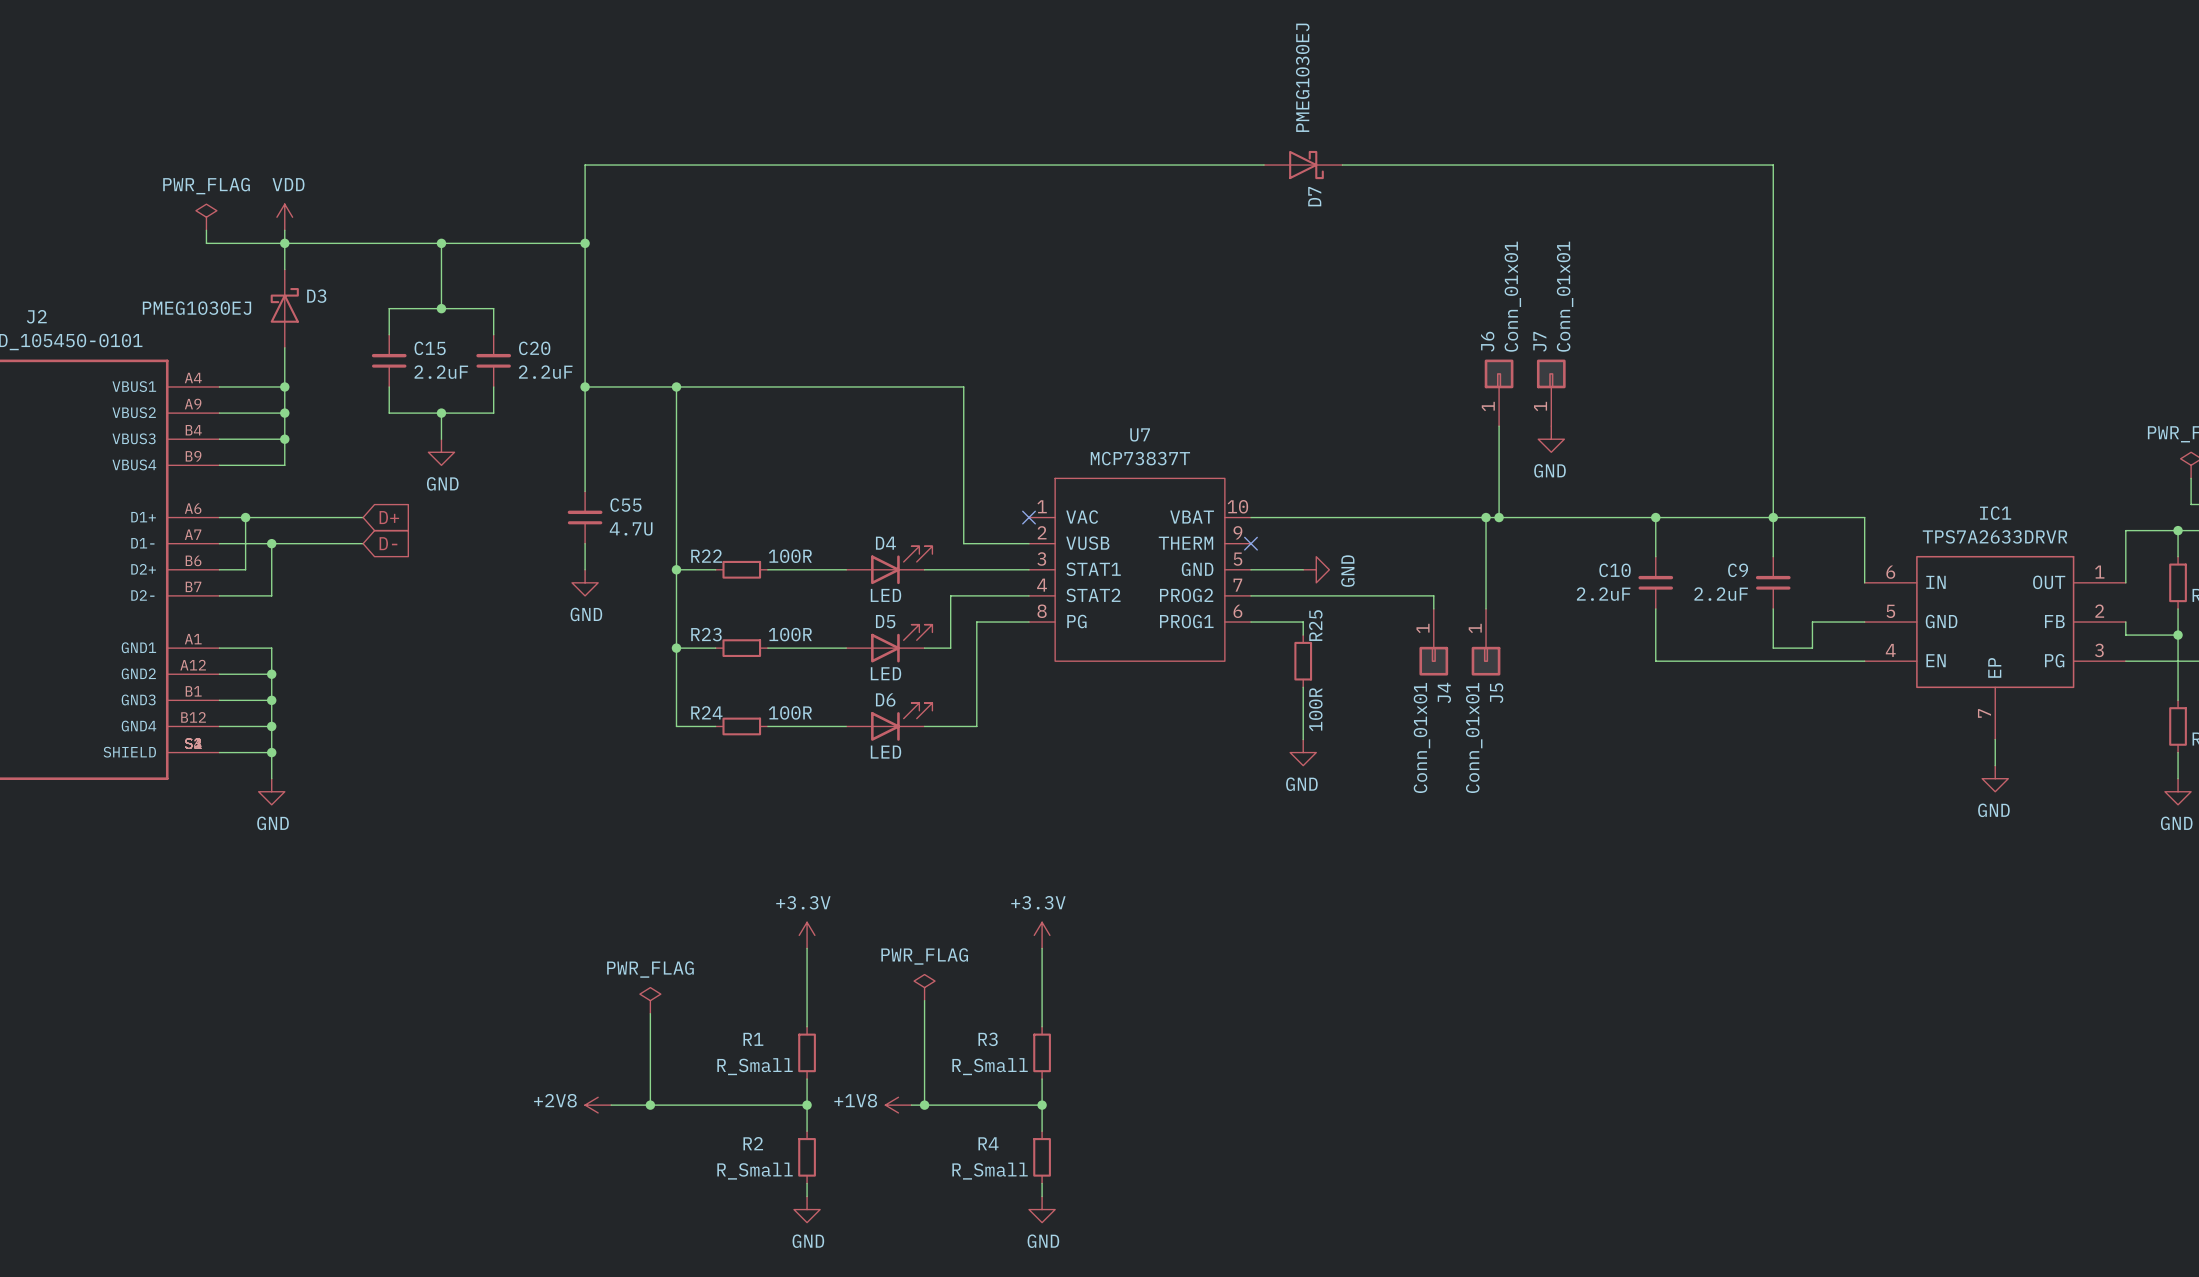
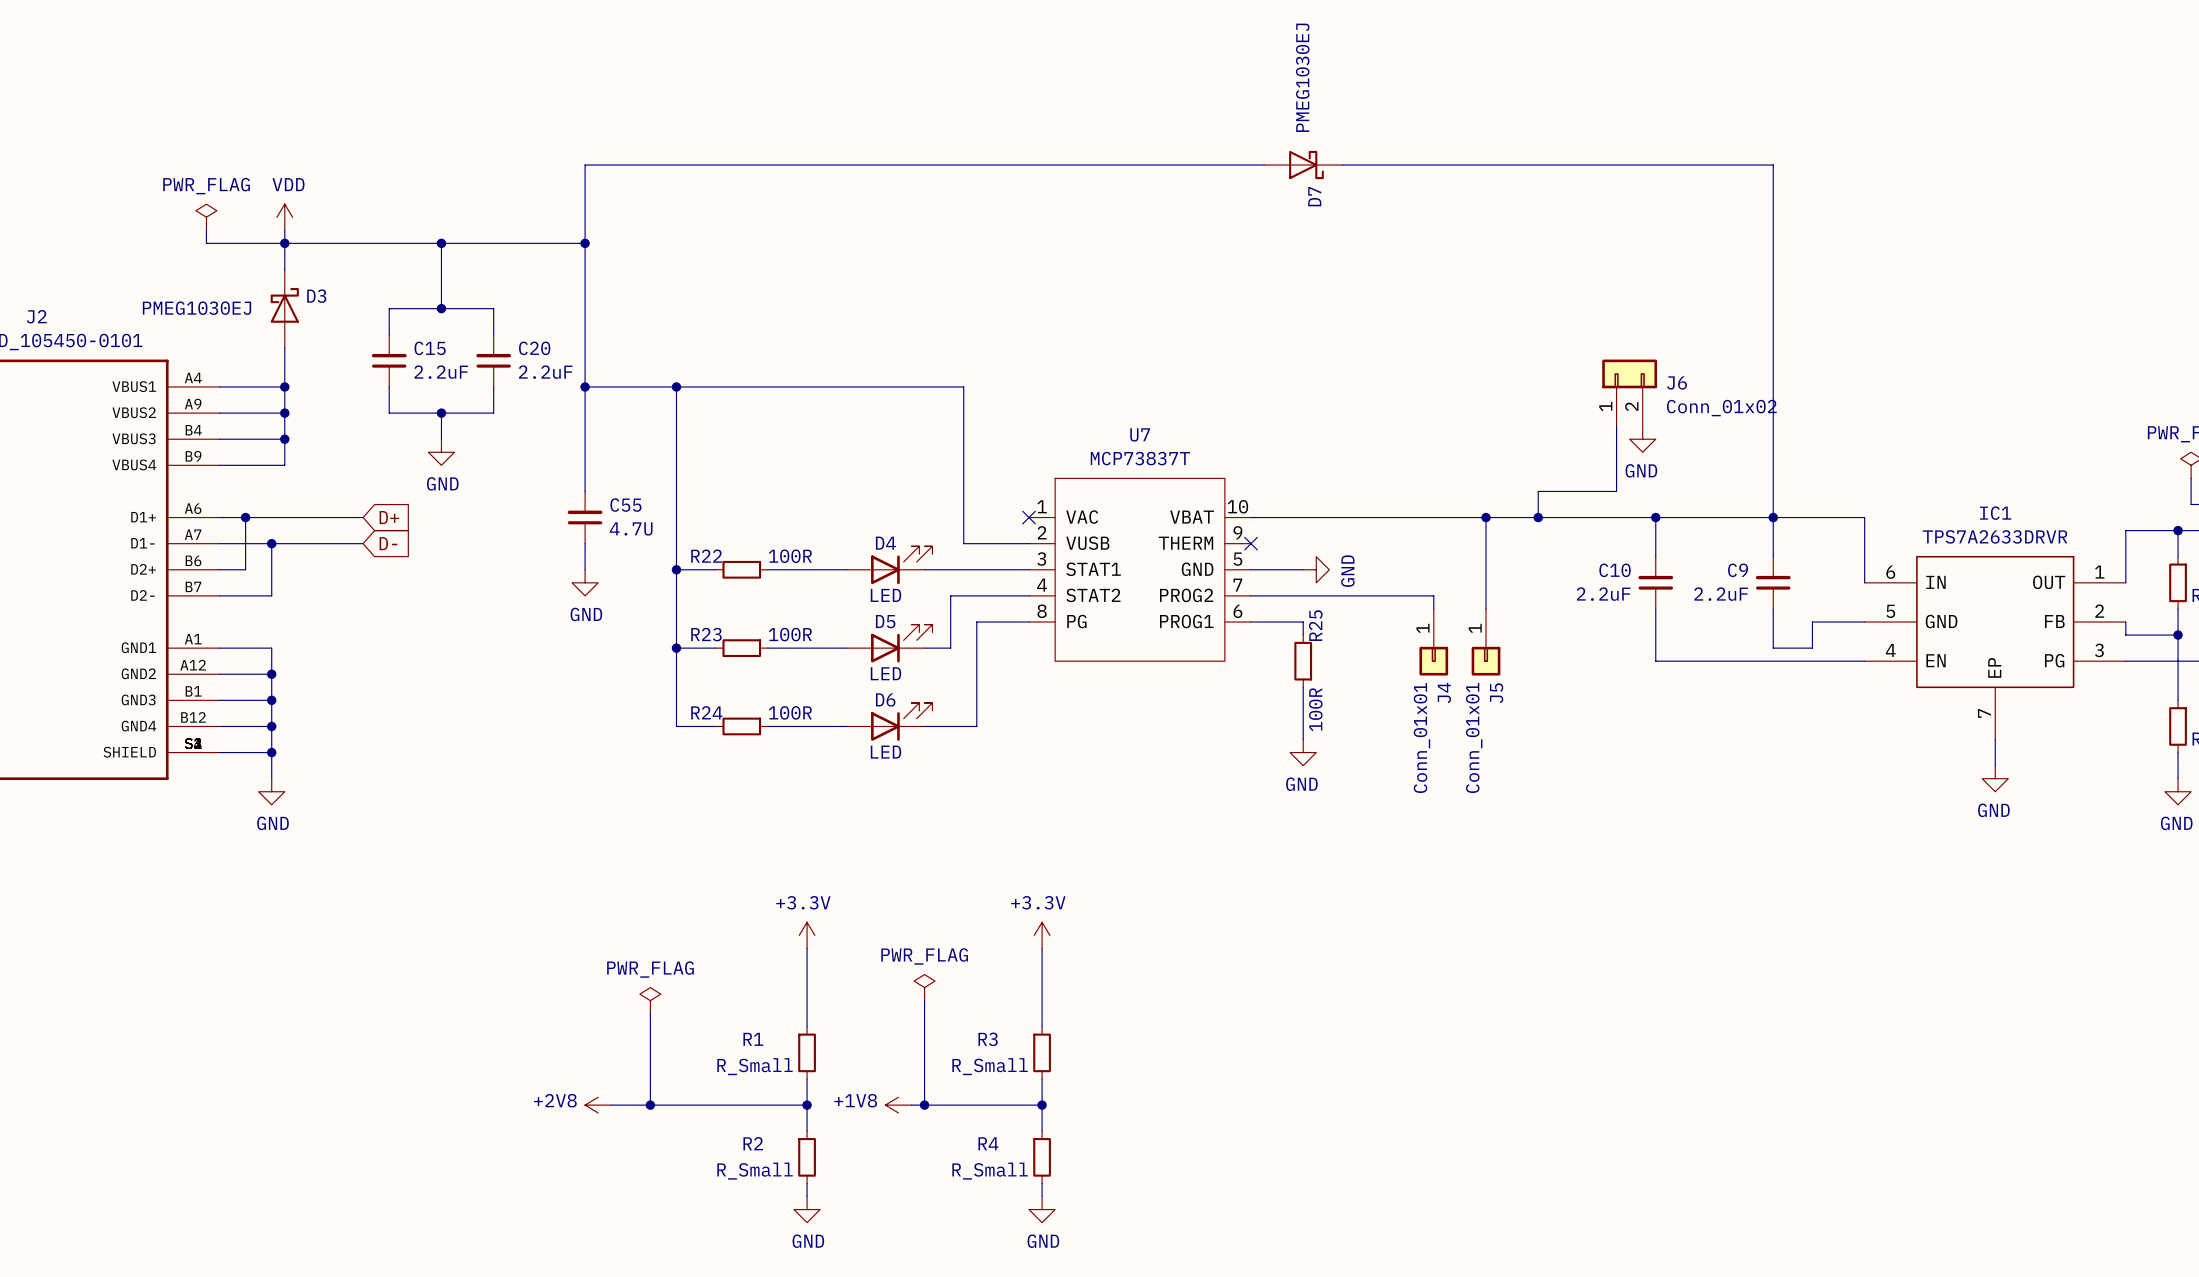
J6 value: Conn_01x01 (1512, 296) -> Conn_01x02 (1721, 408)
J6 name position: J6 (1487, 341) -> J6 (1677, 382)
J6 symbol: [1484, 359, 1514, 427] -> [1602, 359, 1658, 427]
J7: Conn_01x01 (1551, 392) -> none
wire: (1499, 426) (1499, 517) -> none
wire: none -> (1616, 426) (1616, 491) (1538, 491) (1538, 517)
power symbol position: GND (1551, 439) -> GND (1642, 439)
junction position: (1499, 517) -> (1538, 517)

